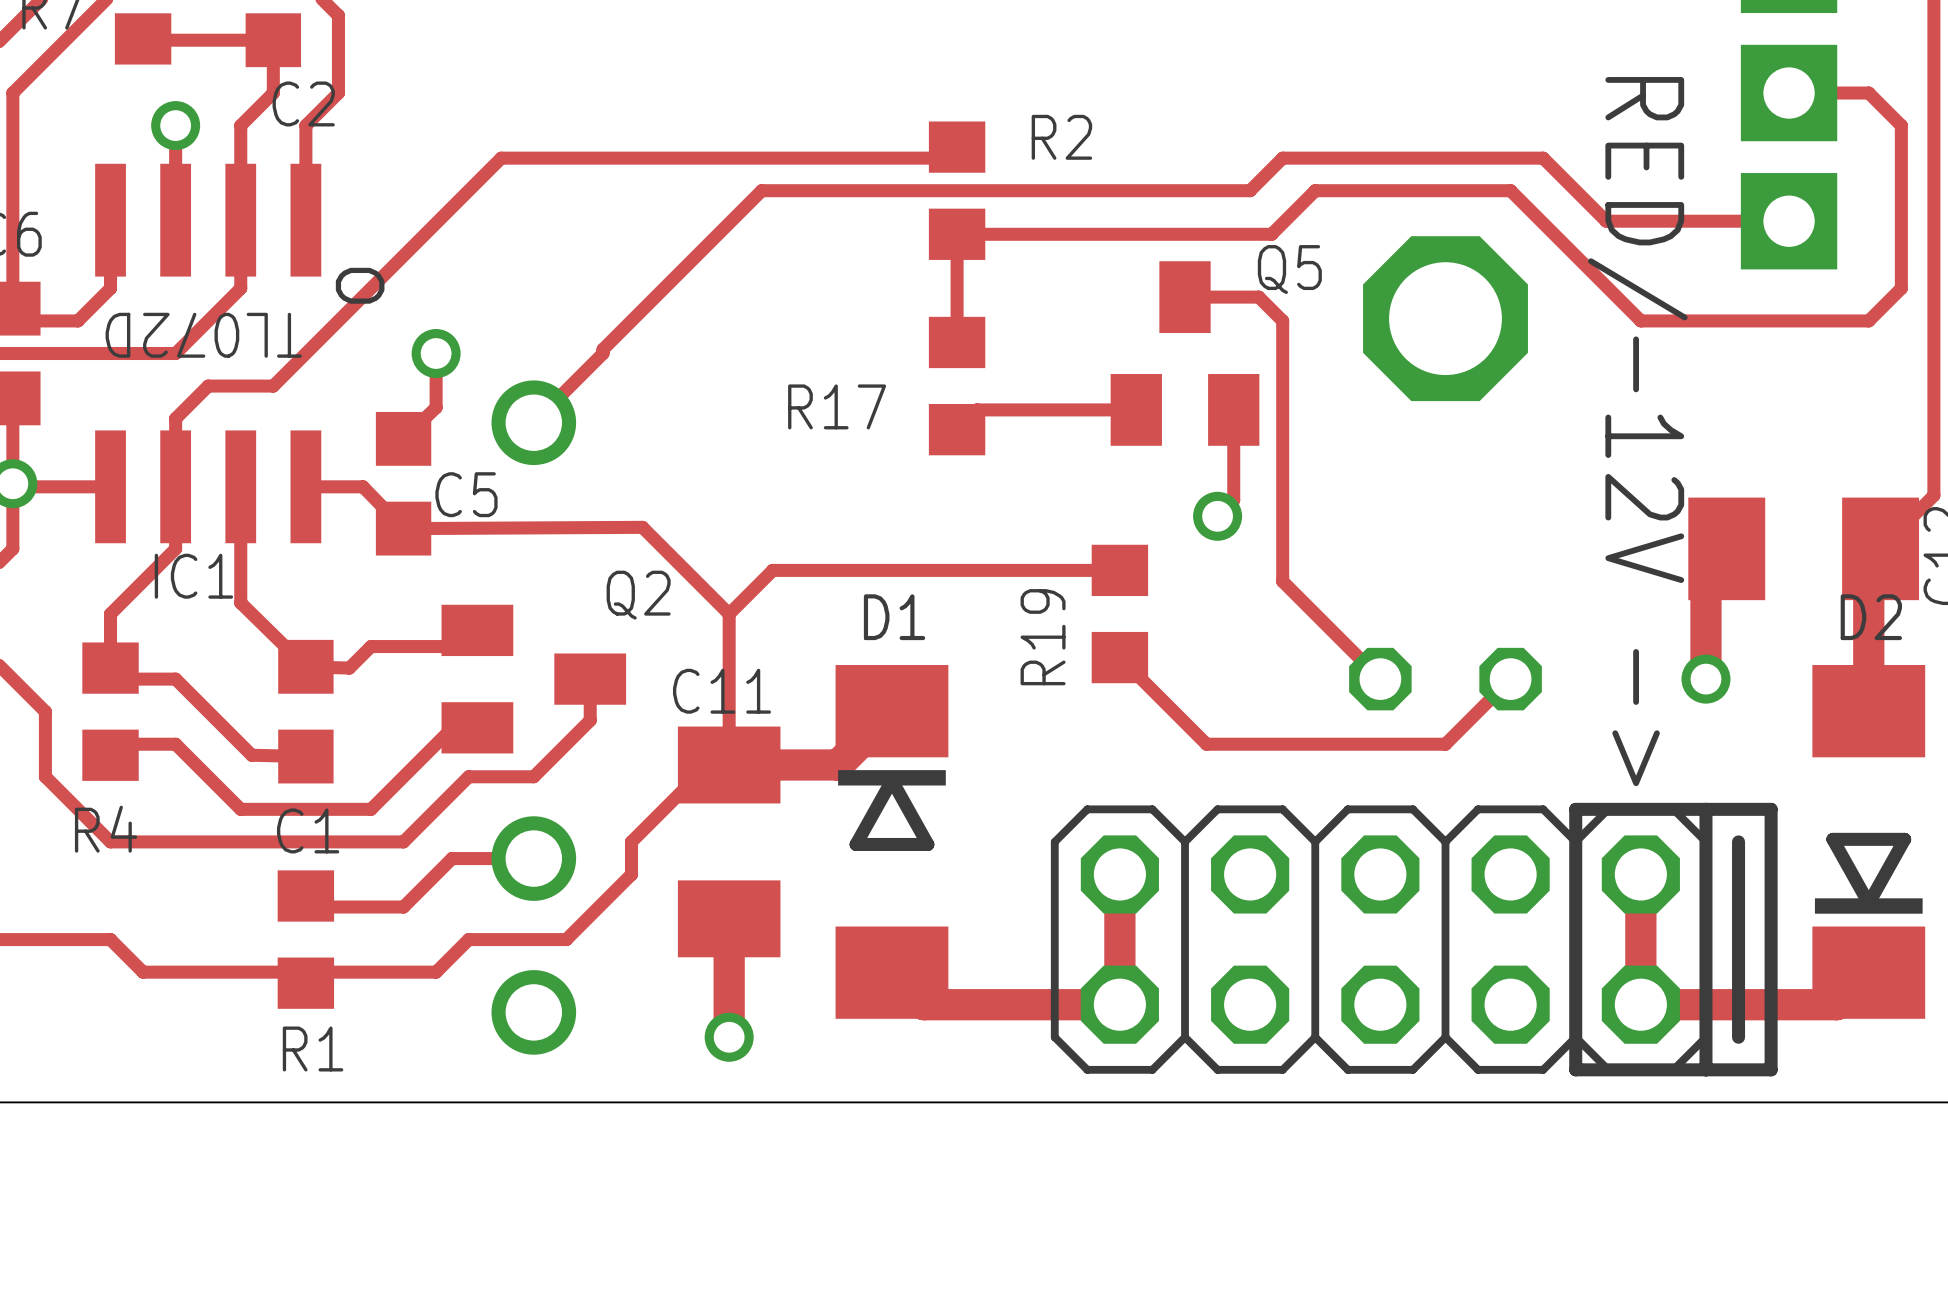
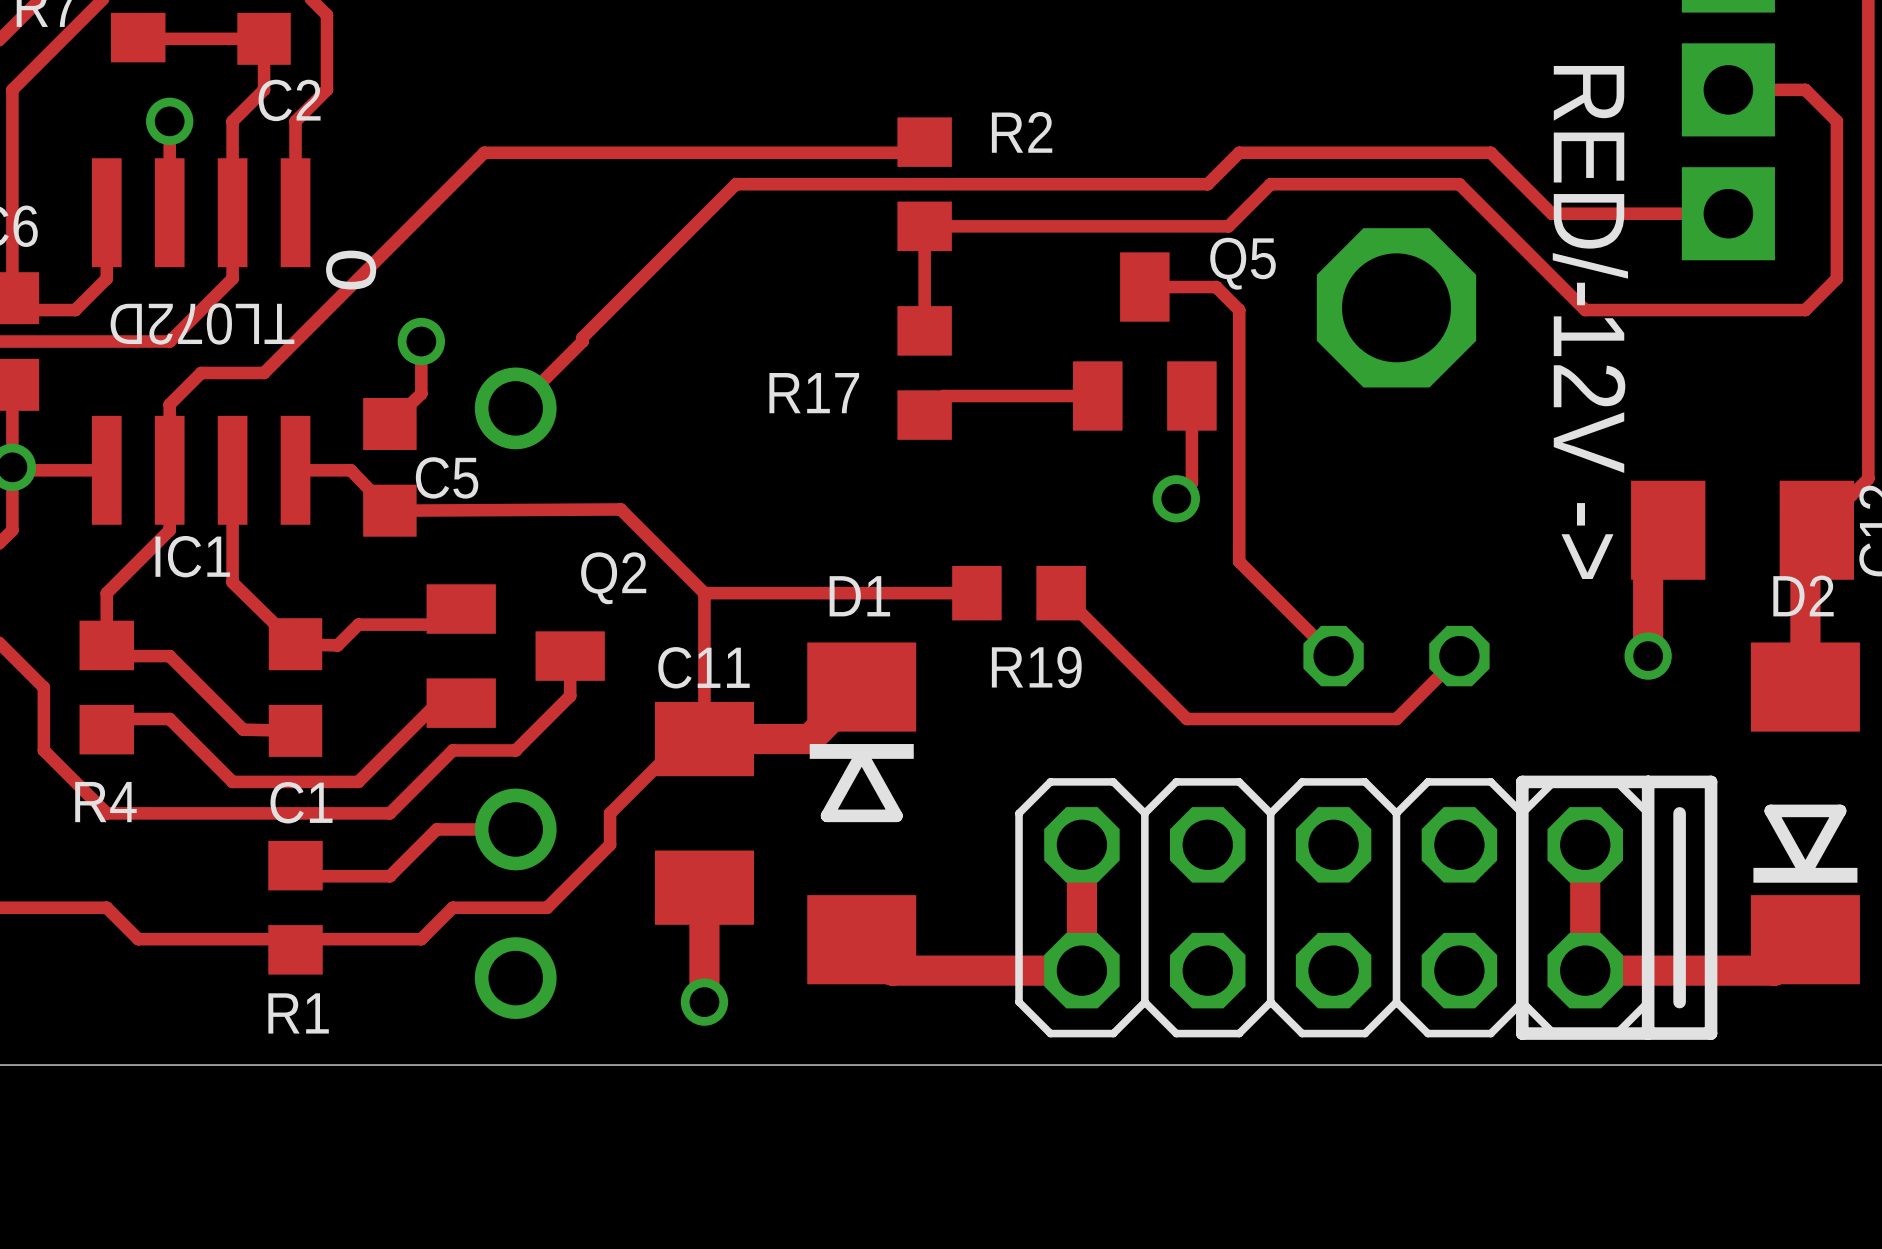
track: (1119, 570) (772, 570) (729, 613) -> (976, 593) (704, 593)
R19 rotation: 0° (1119, 613) -> 90° clockwise (1019, 593)
R19 name position: R19 (1043, 637) -> R19 (1036, 667)
track: (1119, 657) (1206, 744) (1228, 744) -> (1061, 593) (1186, 719)

